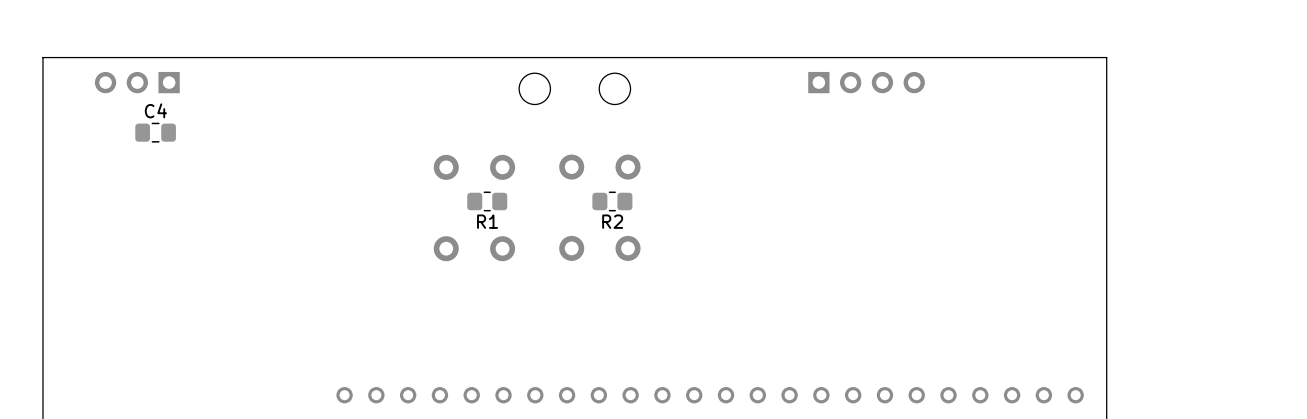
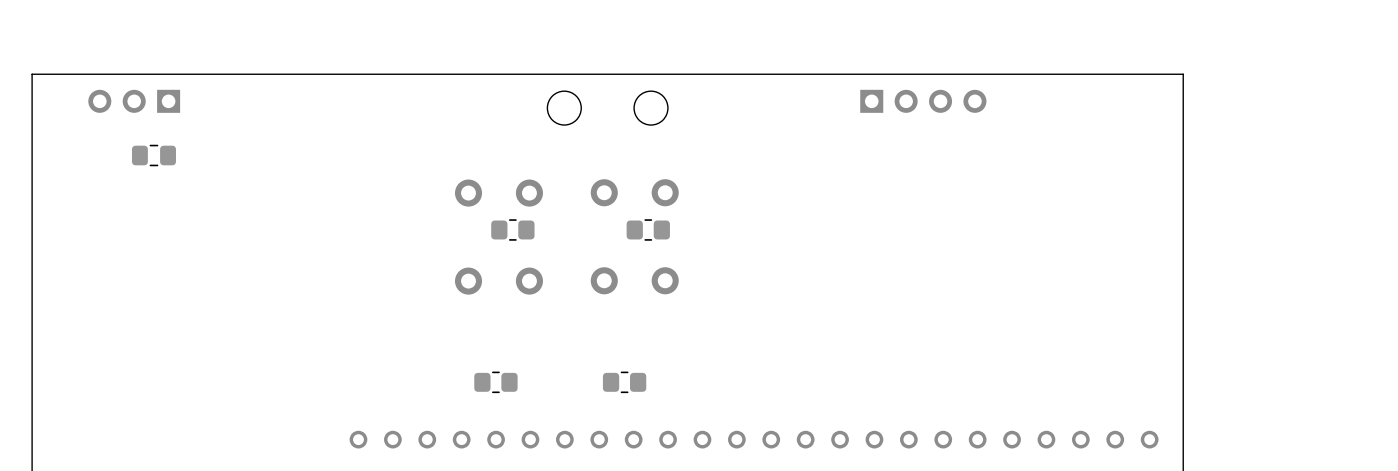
C4 name: C4 (155, 110) -> none
R1 name: R1 (487, 221) -> none
R2 name: R2 (612, 221) -> none
part: none -> (495, 382)
part: none -> (624, 382)

